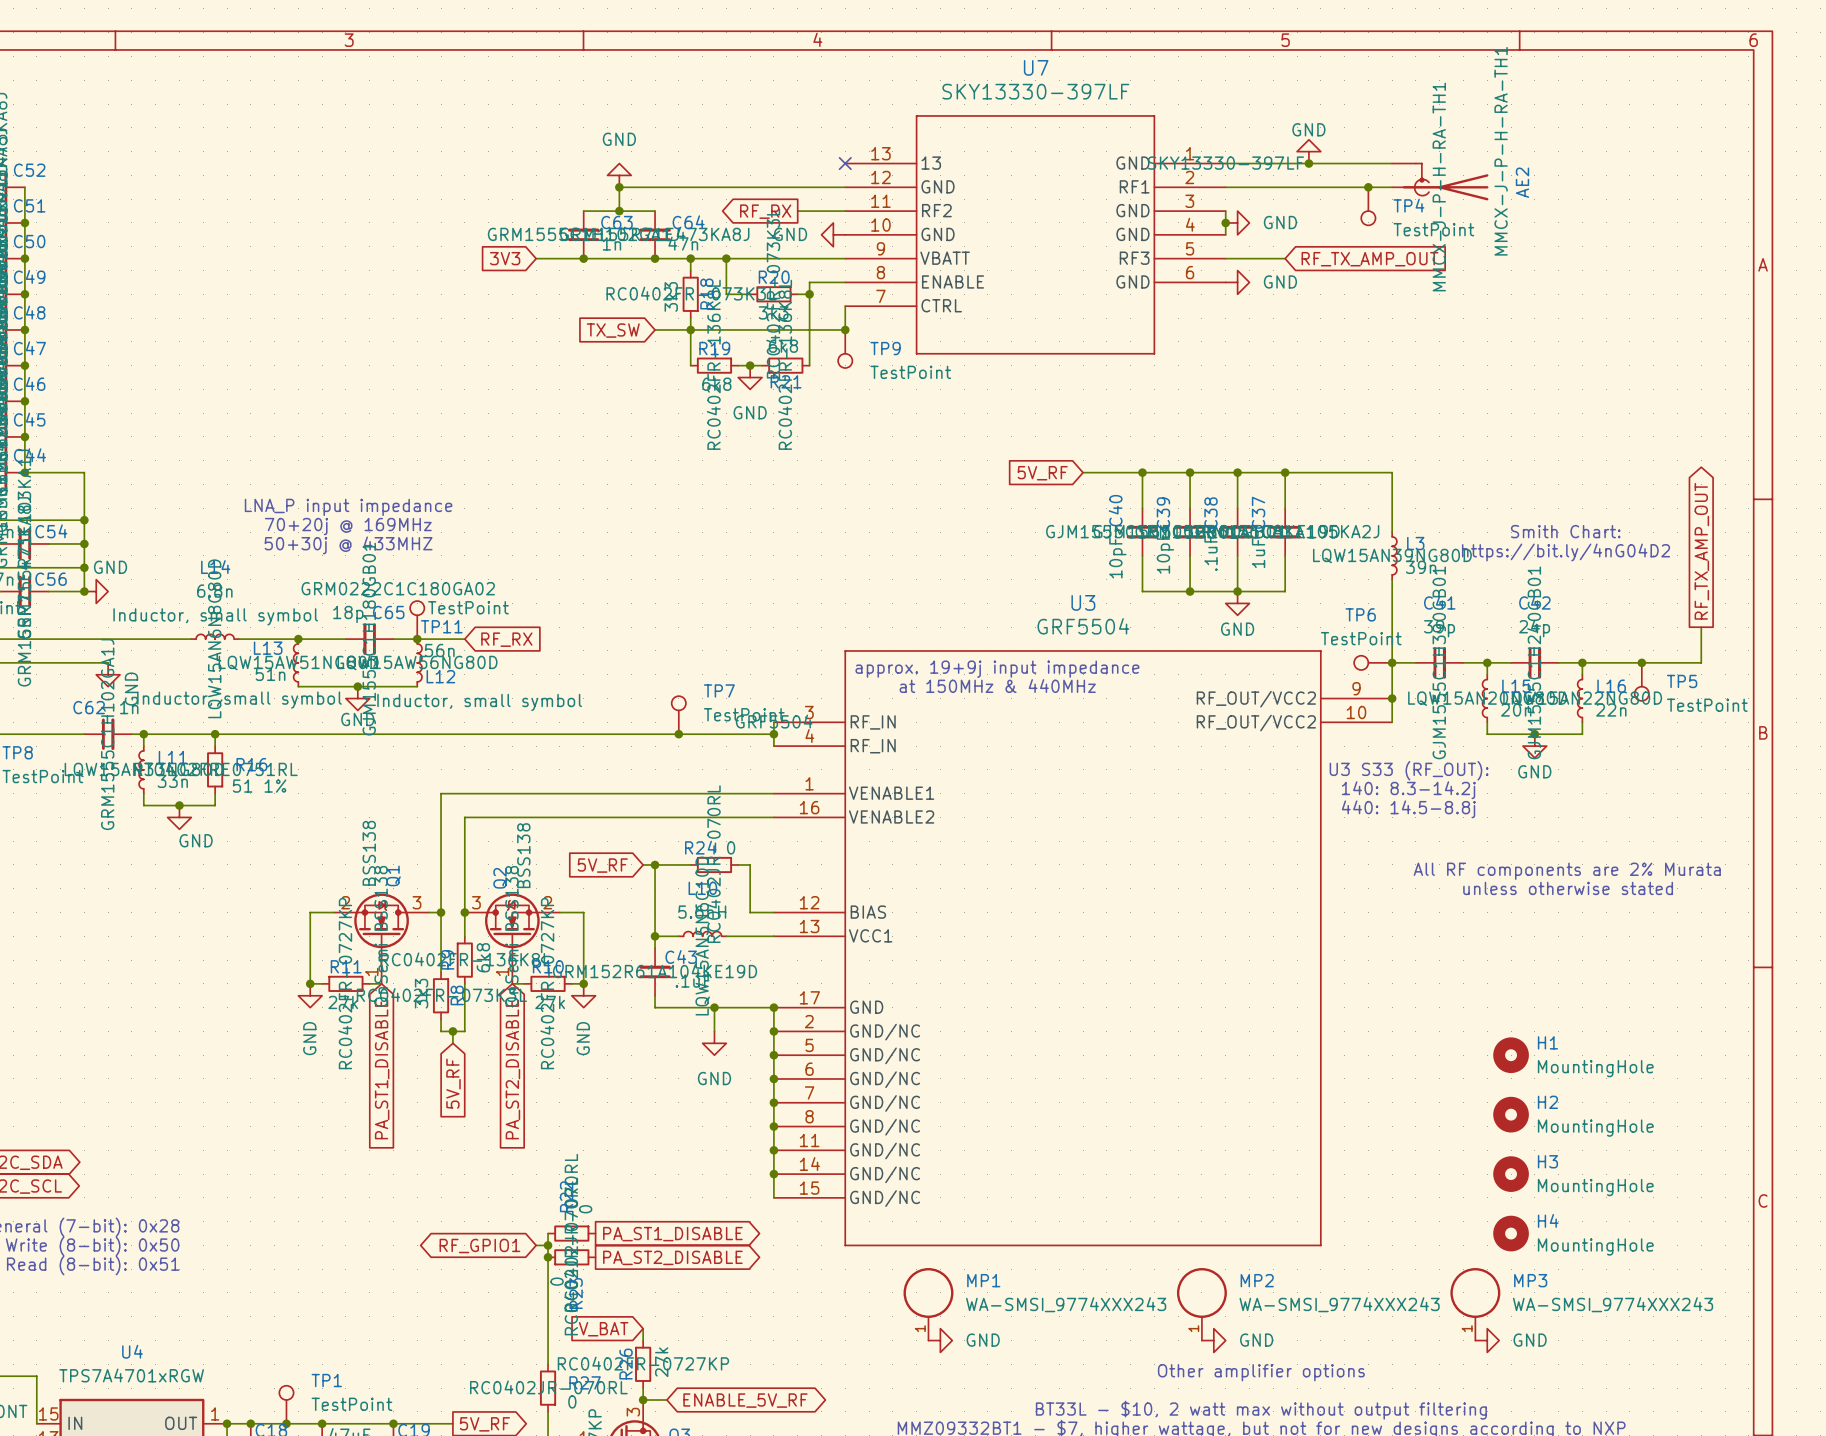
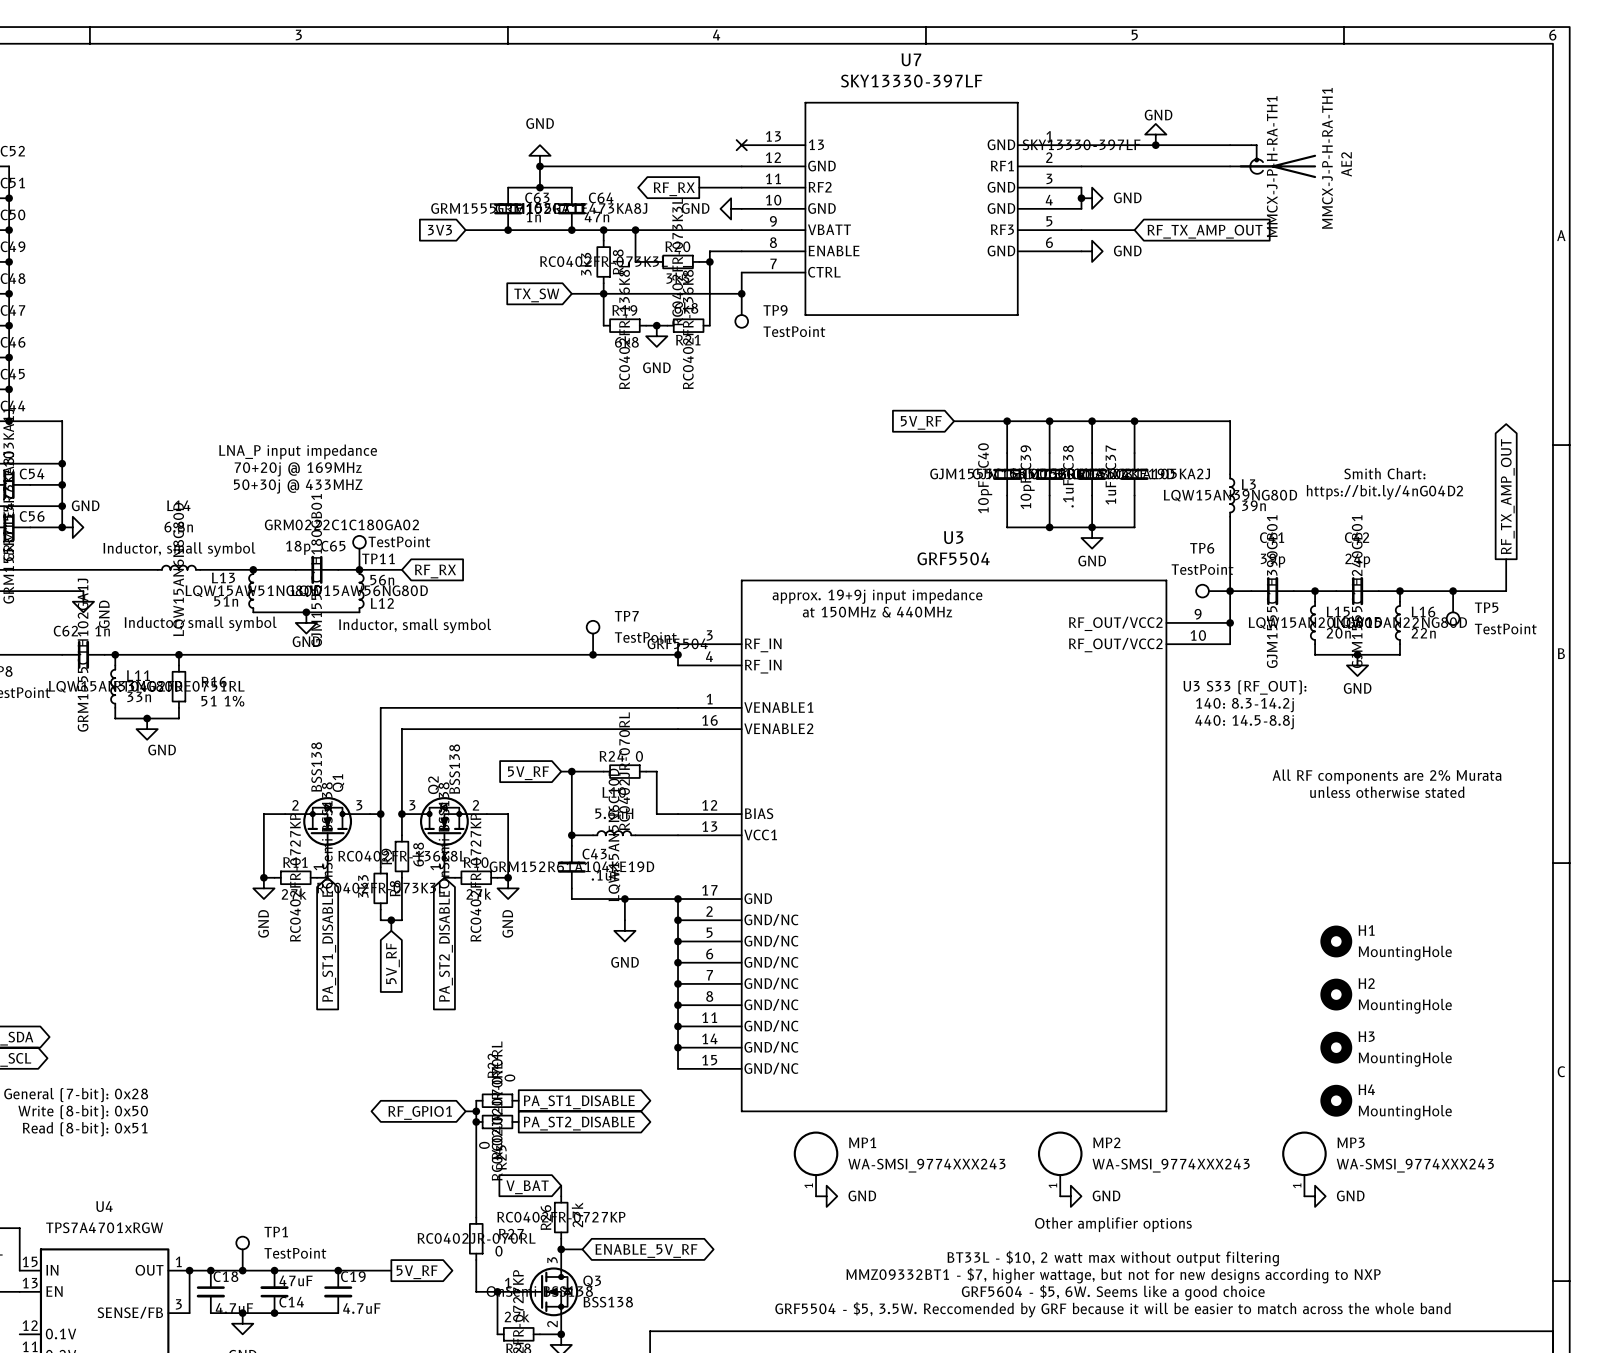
junction: (1368, 187) -> none
TP4: TestPoint (1368, 206) -> none

